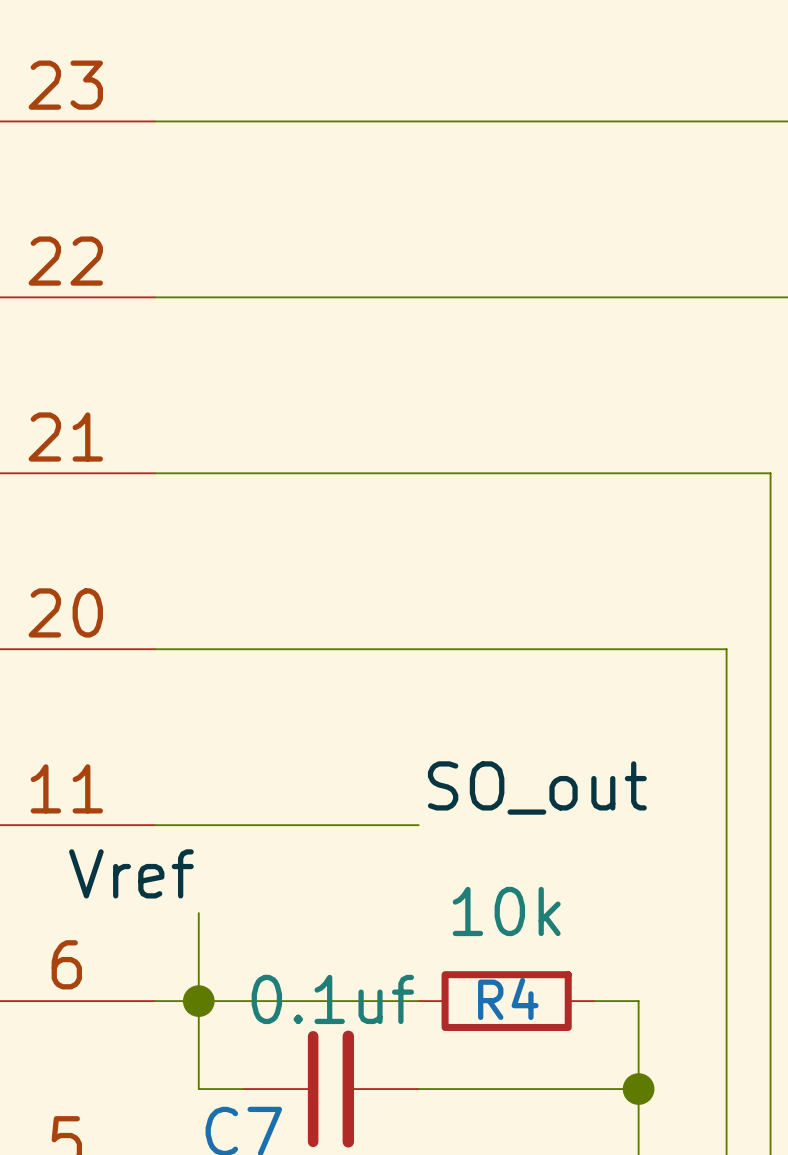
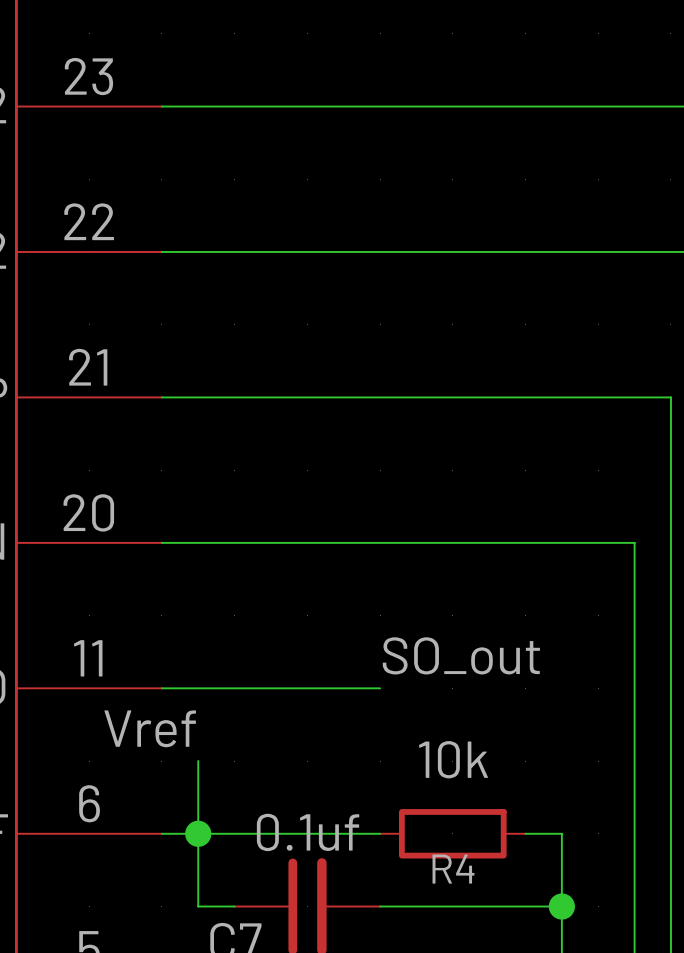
R4 name position: R4 (508, 998) -> R4 (453, 869)

